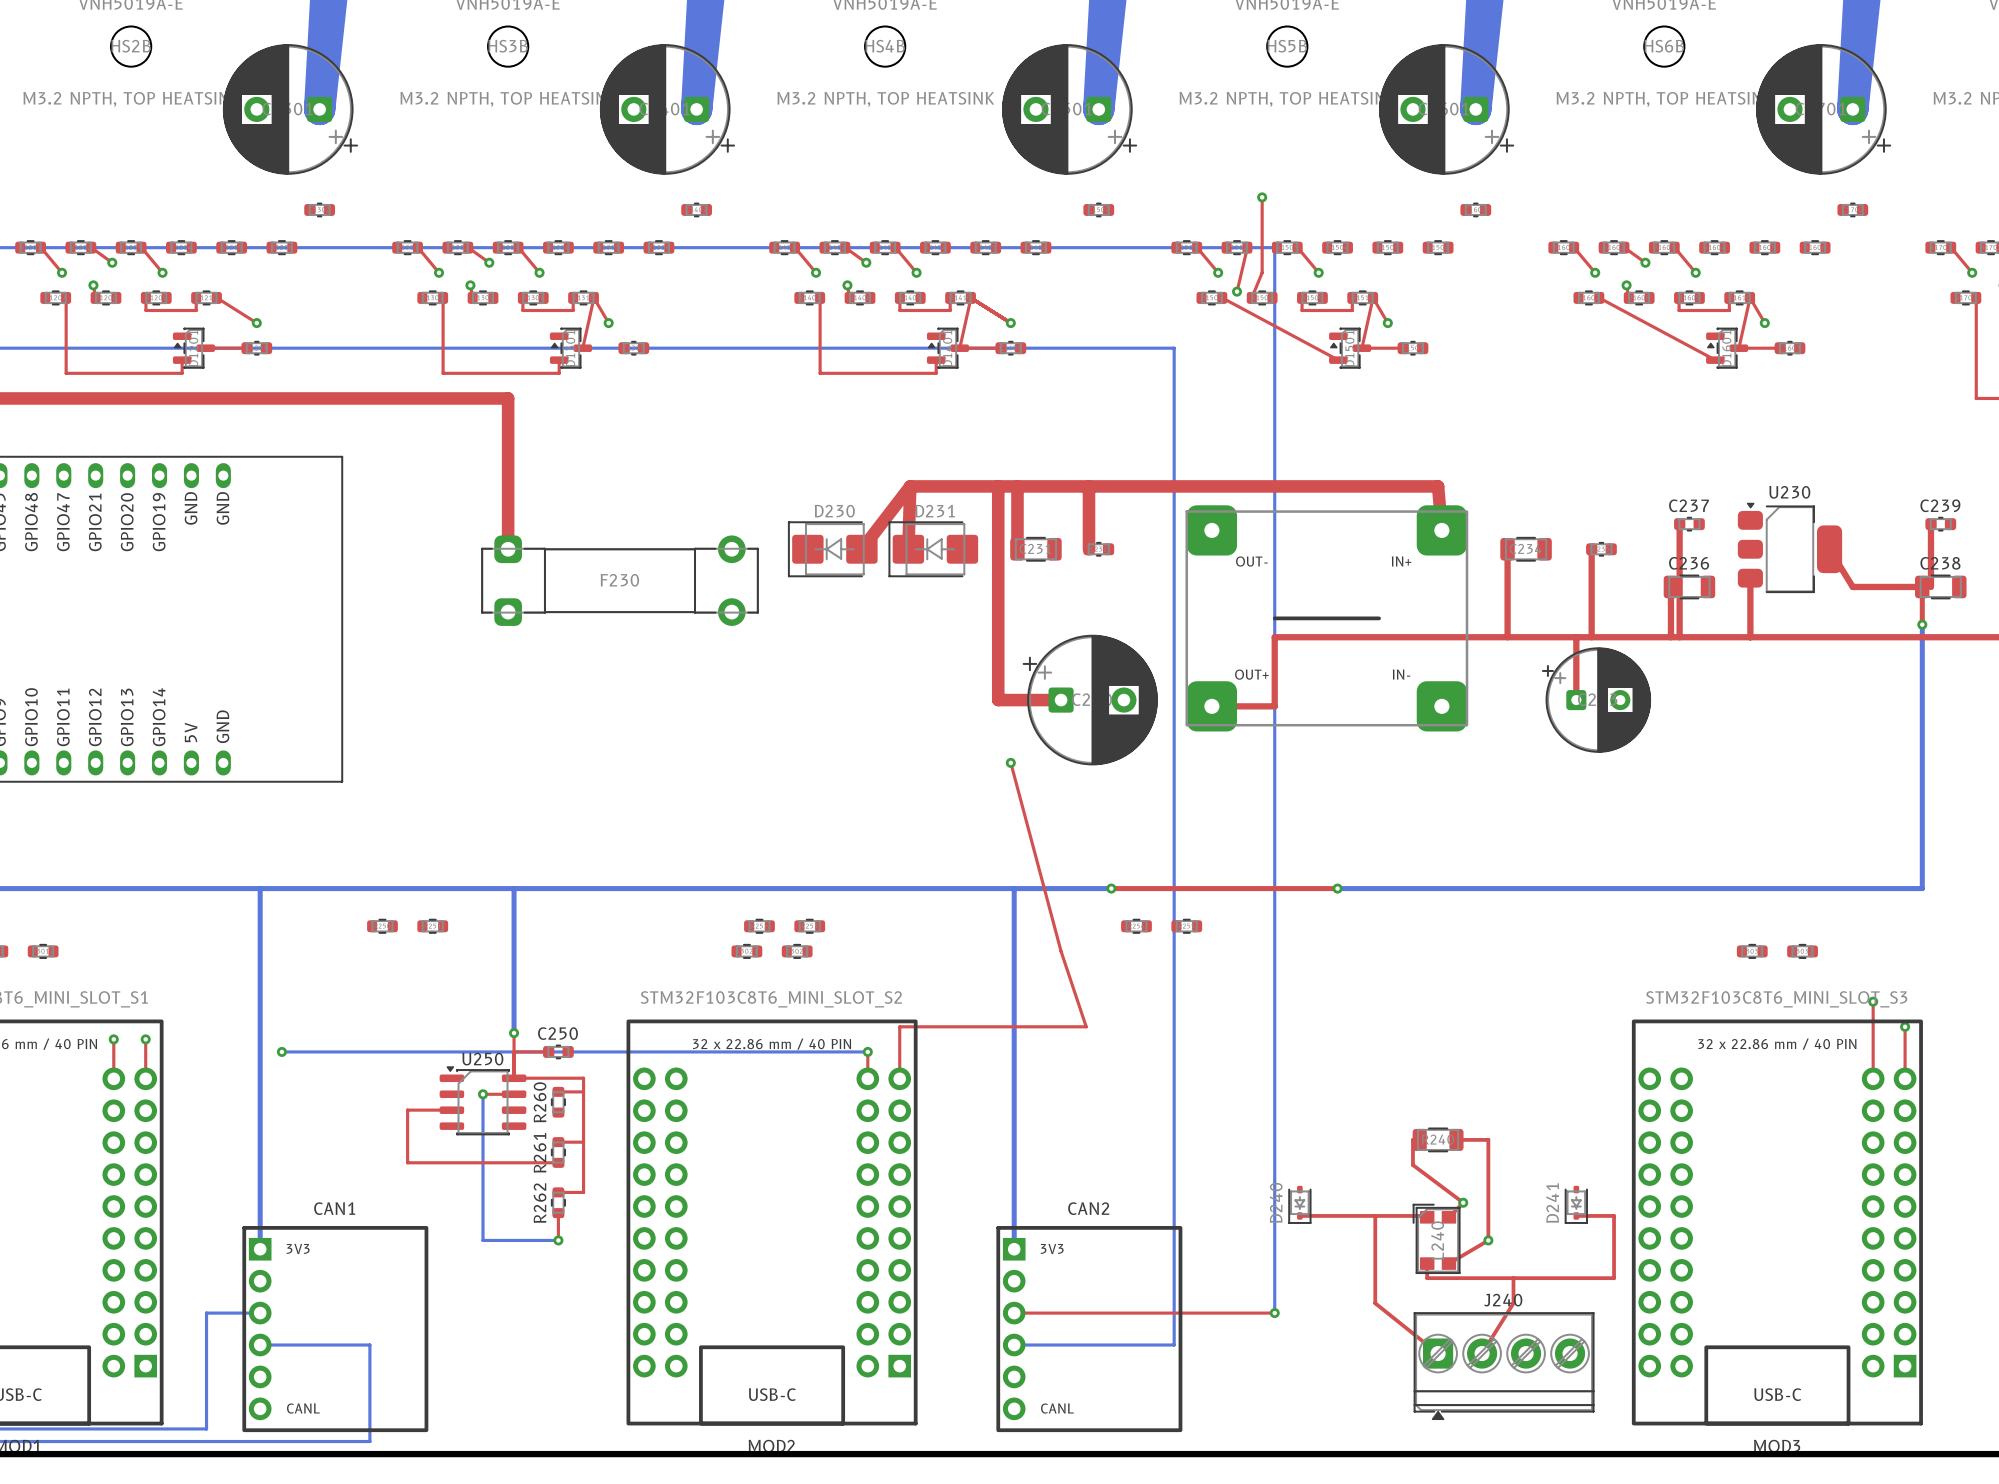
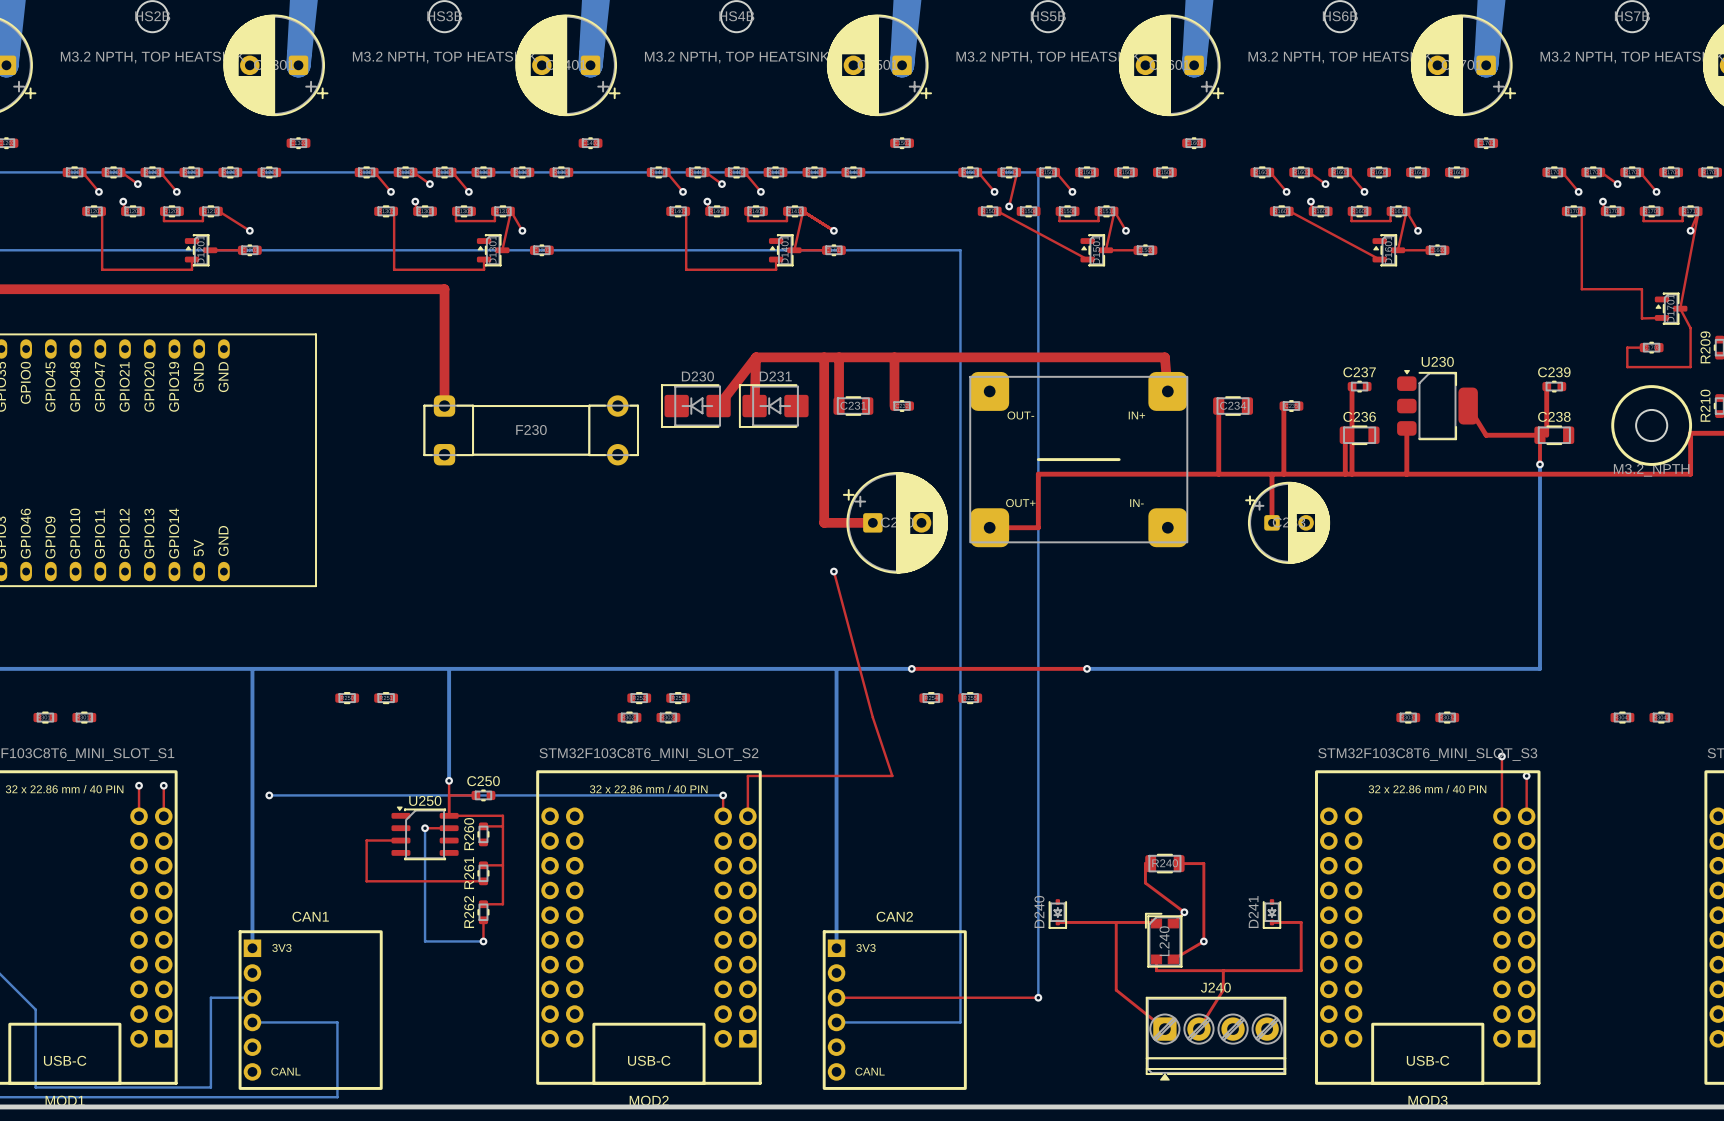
top track: (1262, 197) (1262, 272) (1251, 297) -> none
via: (1262, 197) -> none

